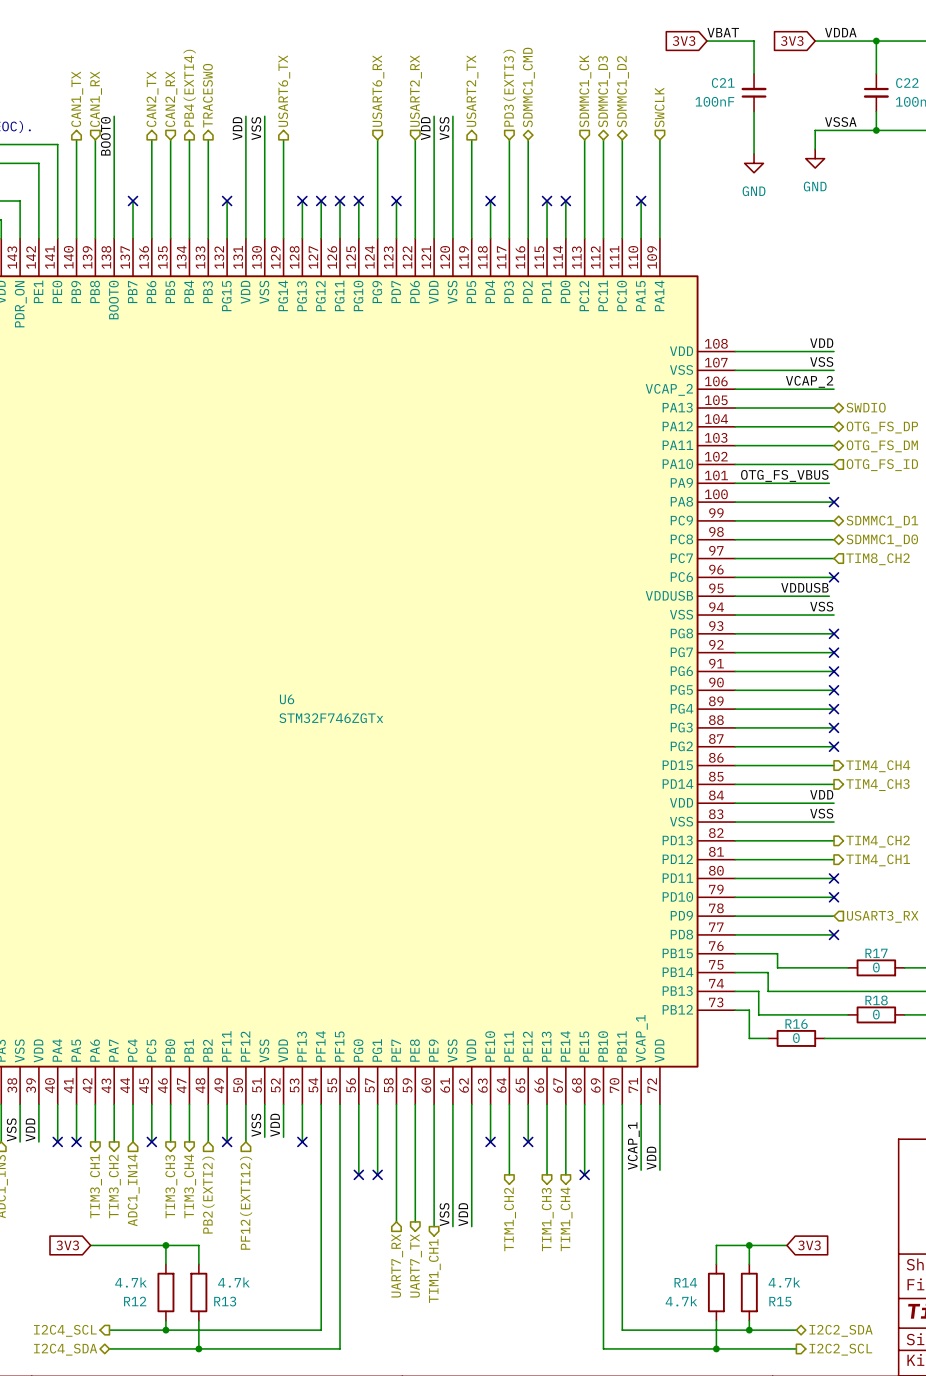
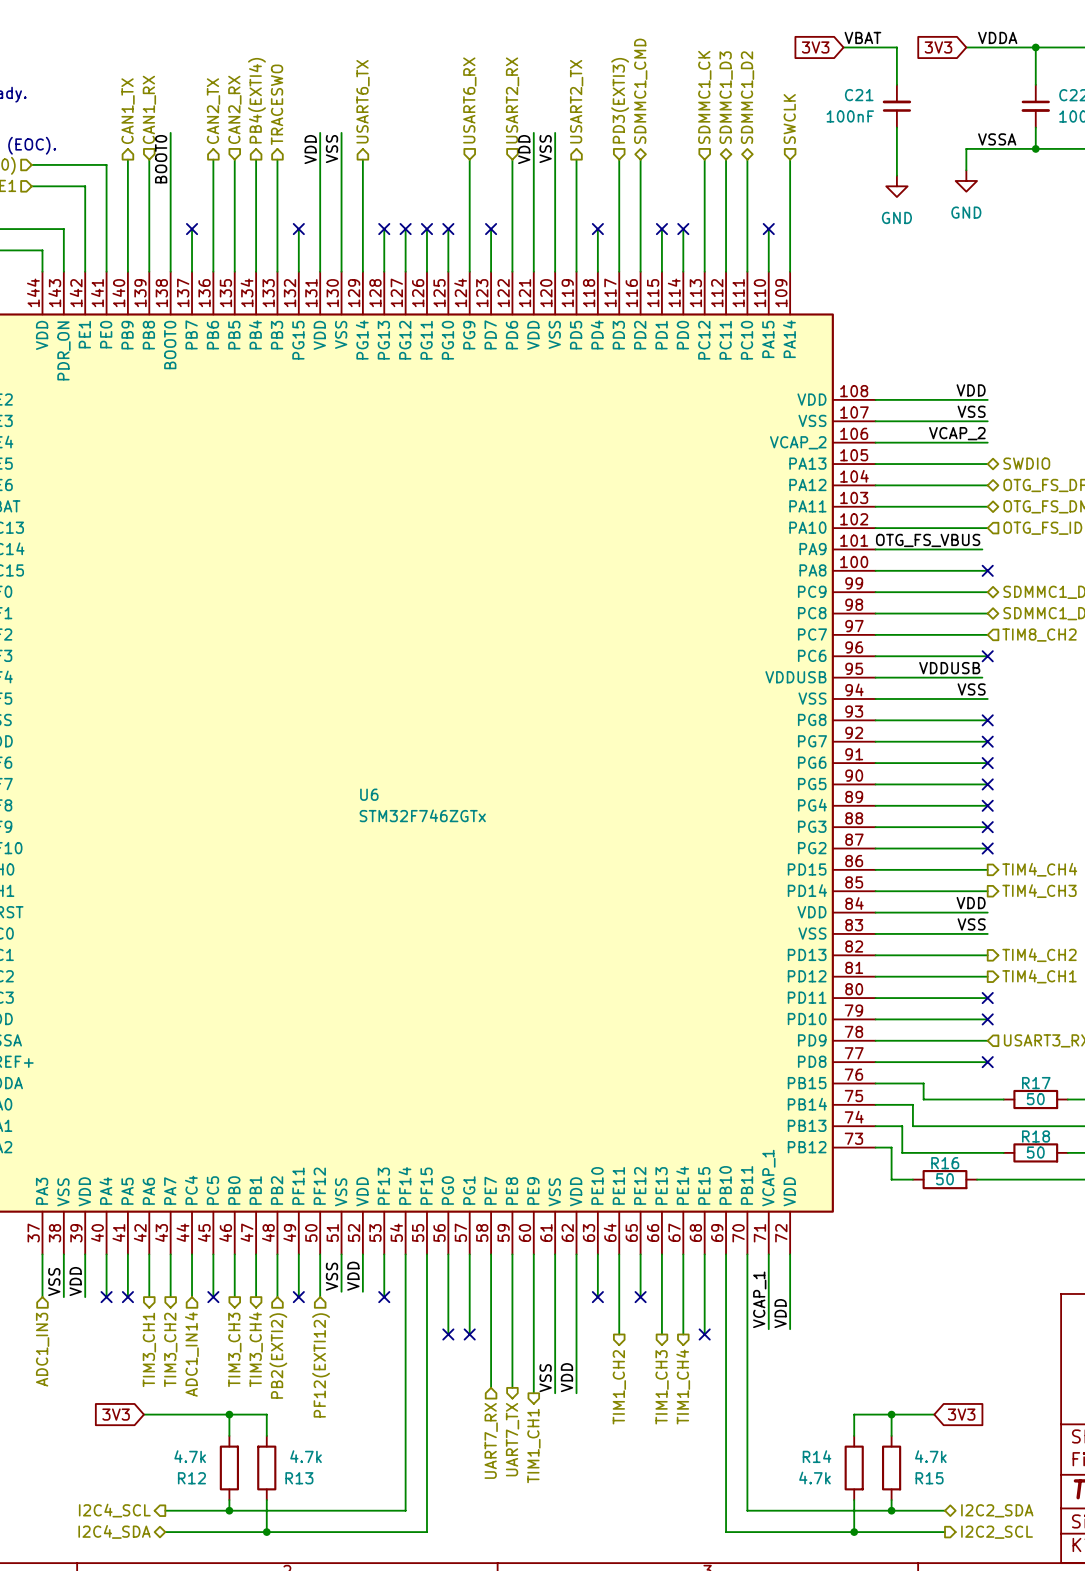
R17 value: 0 (876, 967) -> 50 (1035, 1099)
R18 value: 0 (876, 1014) -> 50 (1035, 1152)
R16 value: 0 (796, 1038) -> 50 (944, 1179)

